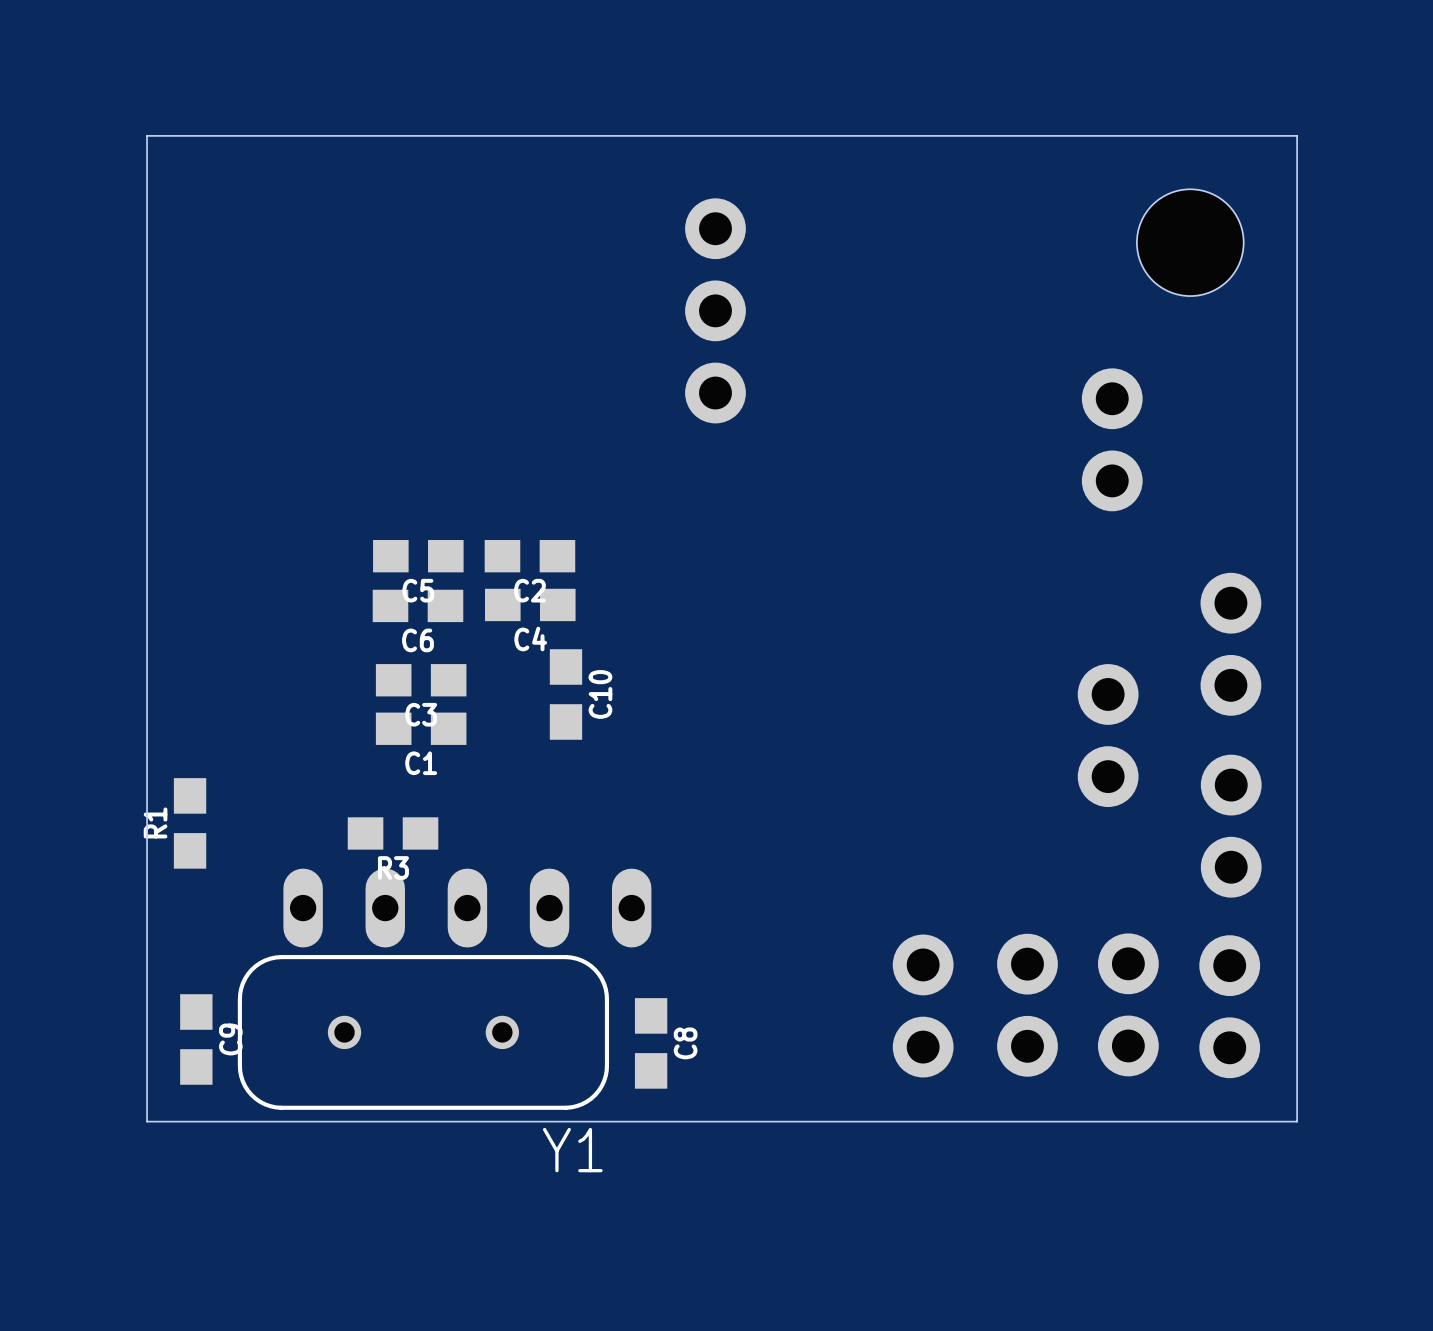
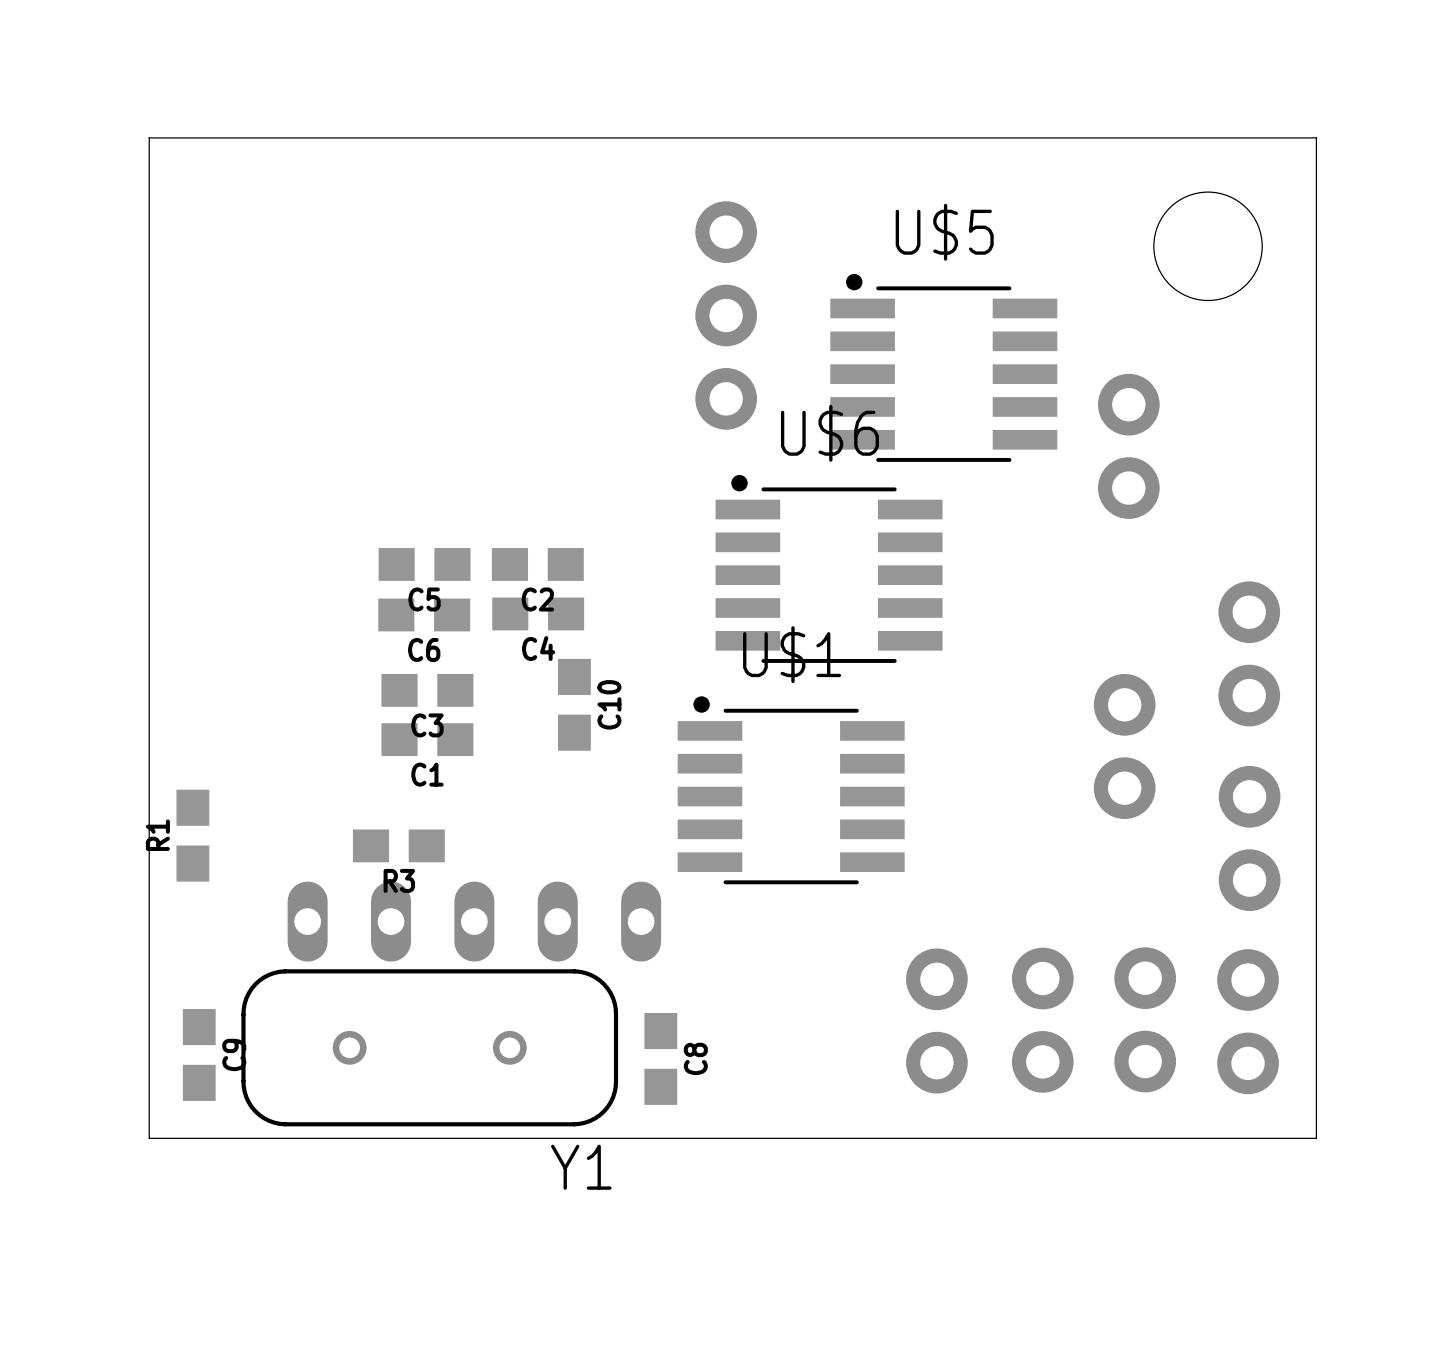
U$5: none -> (943, 367)
U$6: none -> (829, 568)
U$1: none -> (791, 790)

